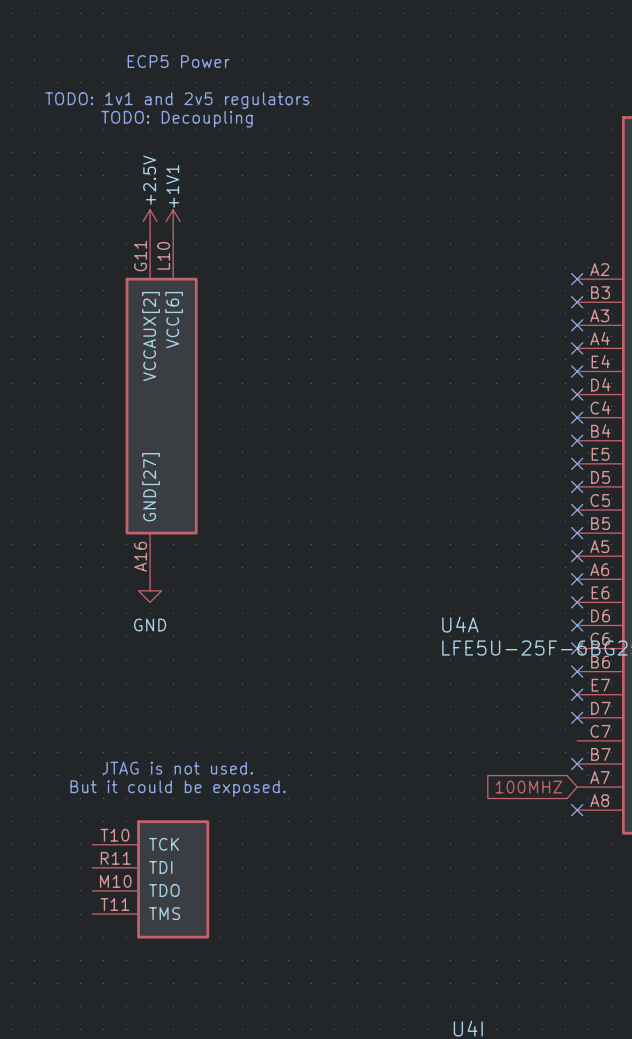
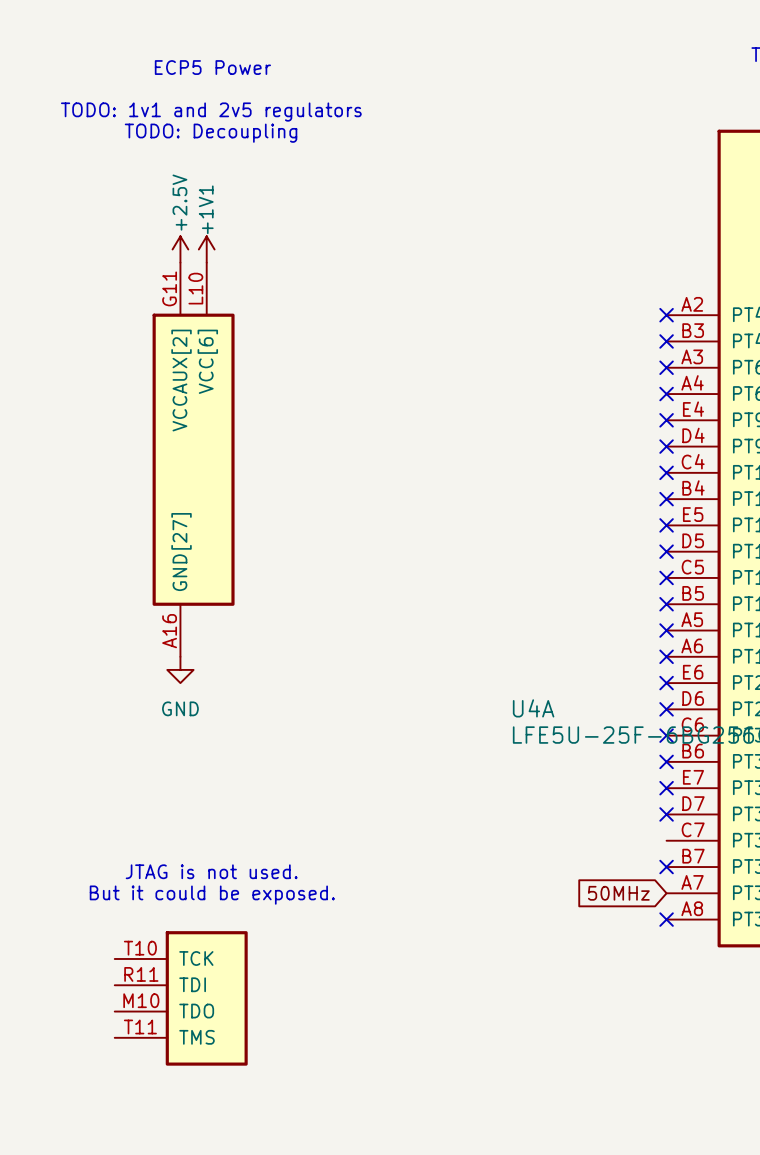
global label: 100MHZ (528, 787) -> 50MHz (618, 893)

